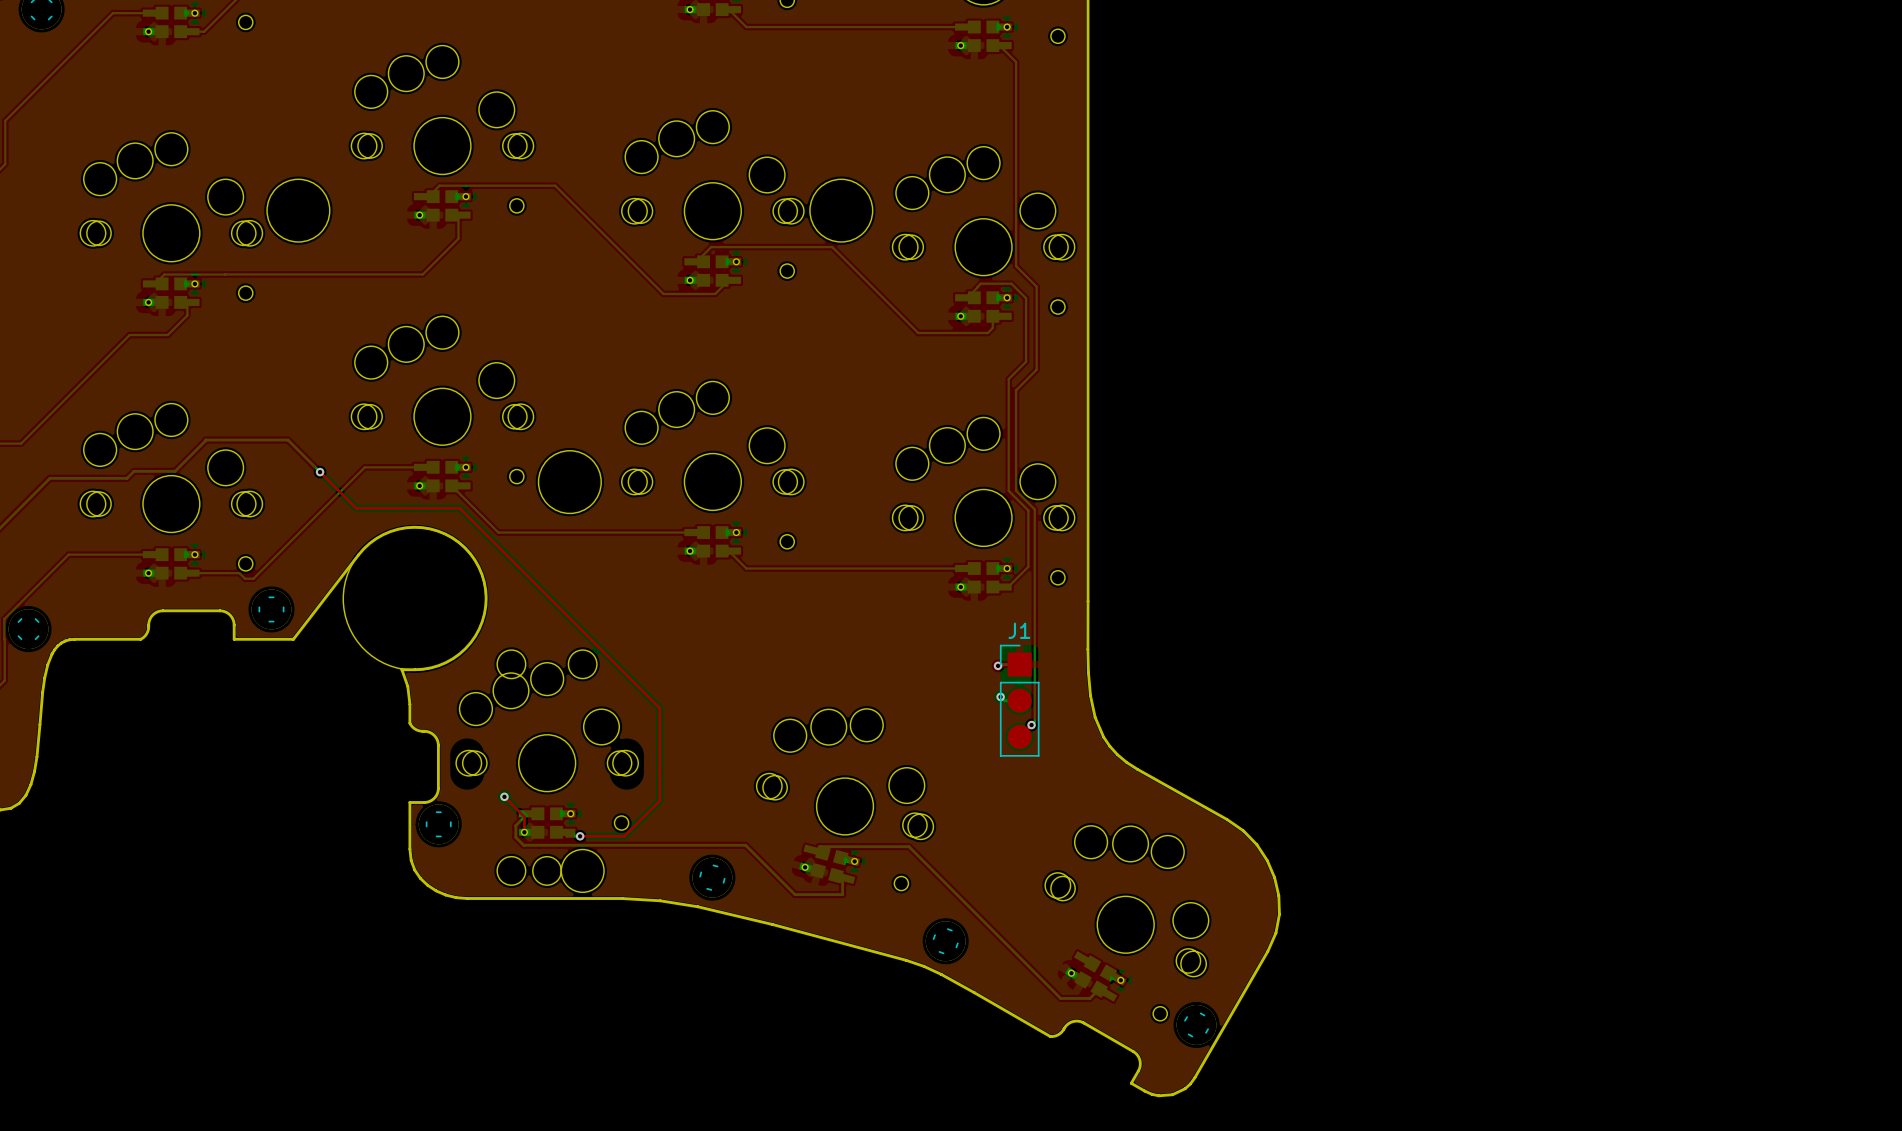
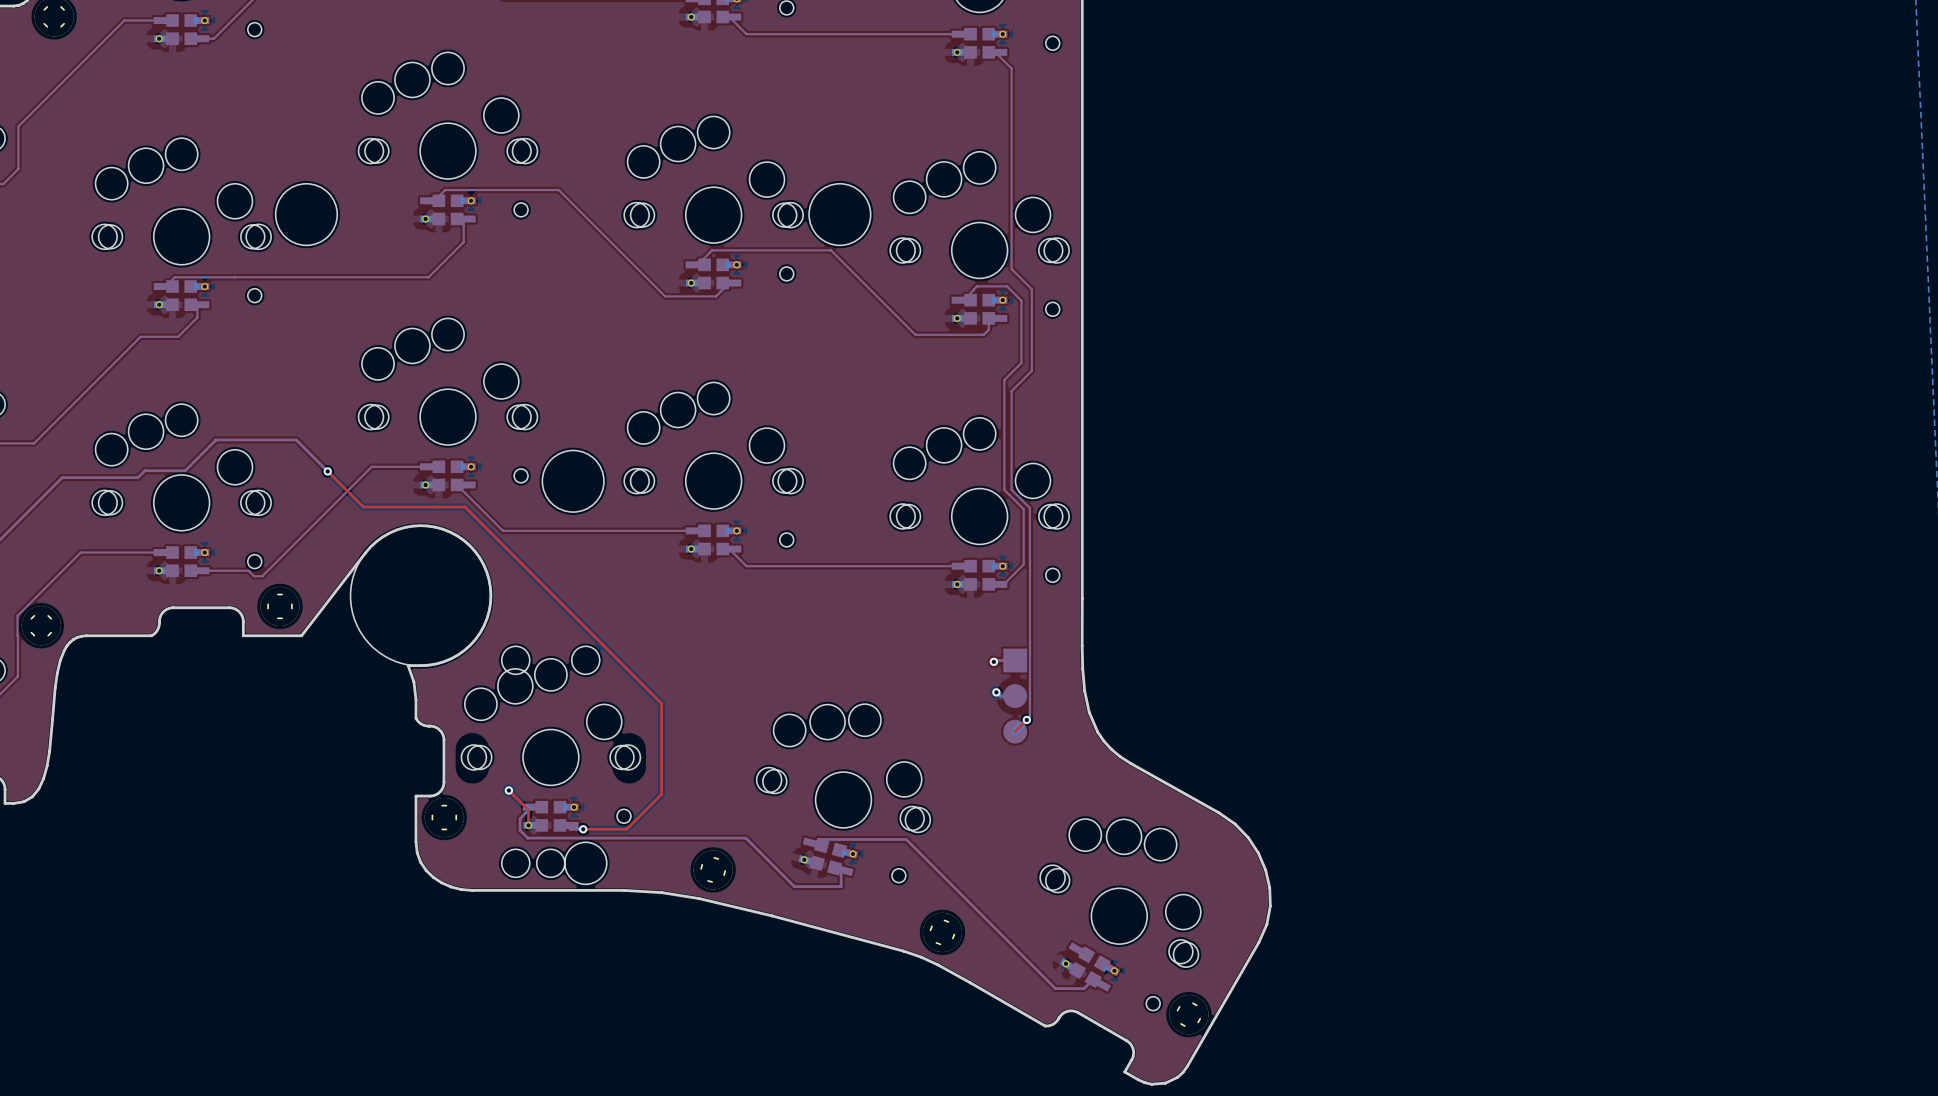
J1 side: top (1019, 700) -> bottom (1015, 696)

